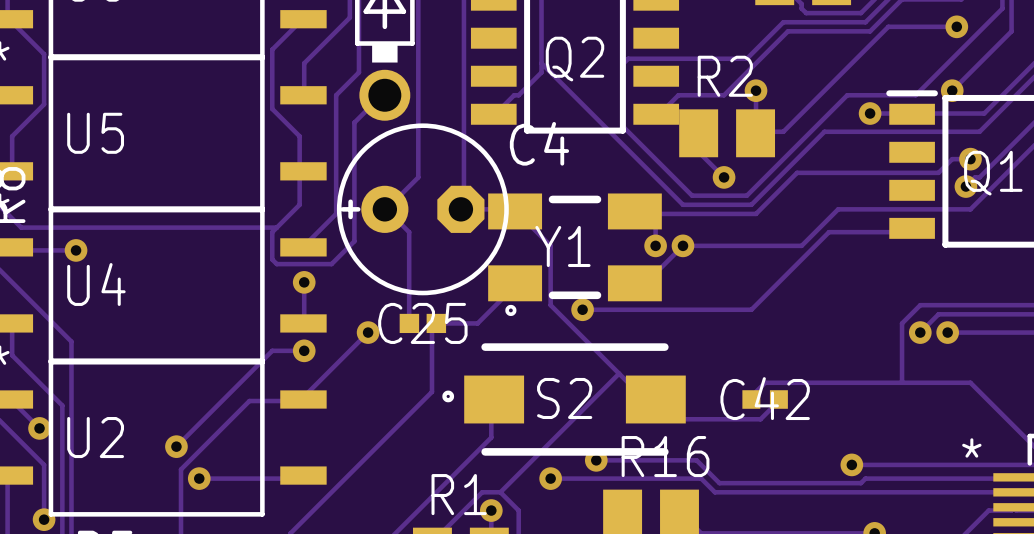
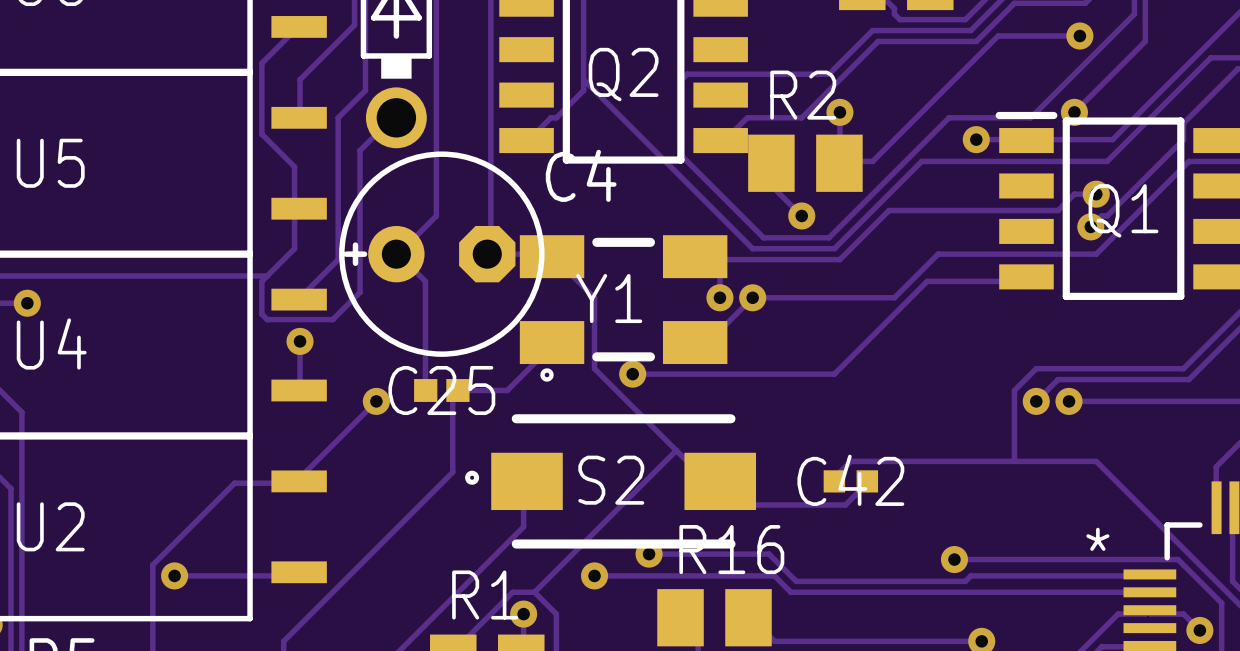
track: (304, 350) (272, 350) (176, 446) -> none
via: (304, 350) -> none
via: (176, 446) -> none

